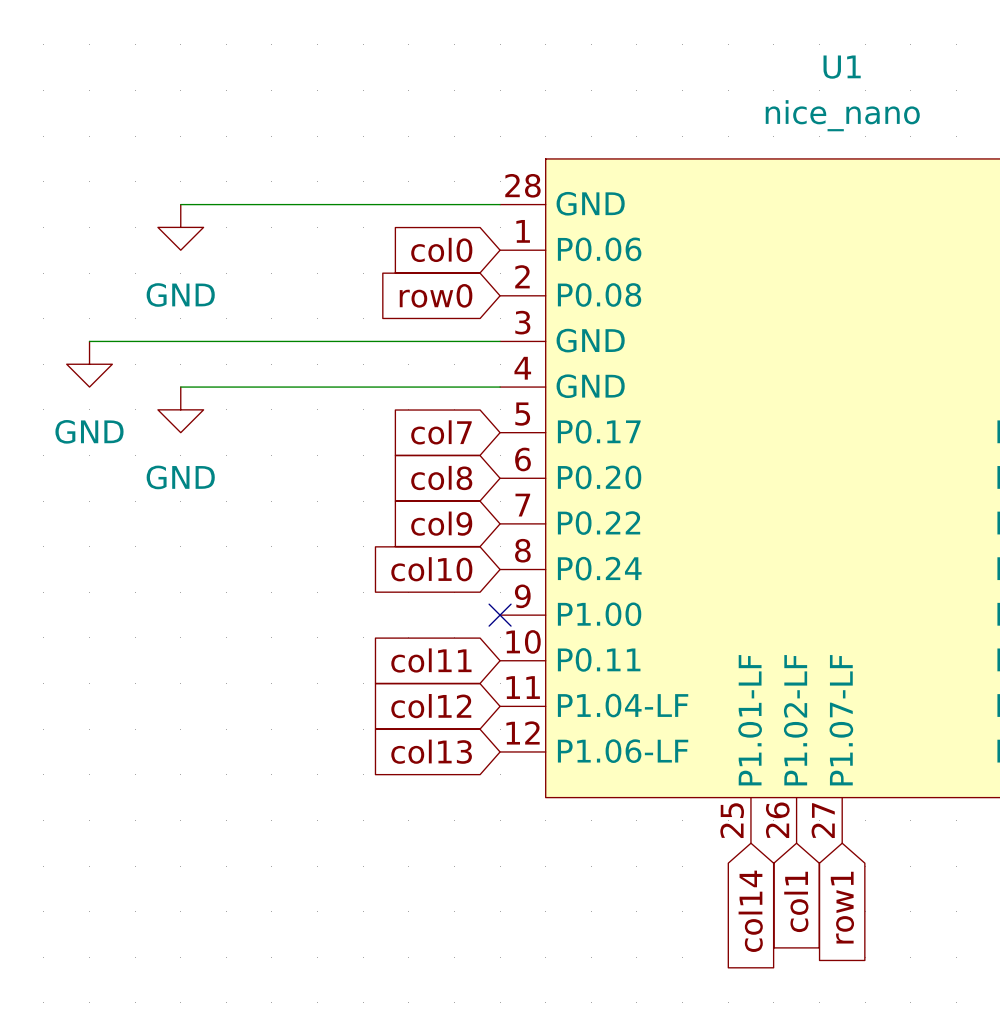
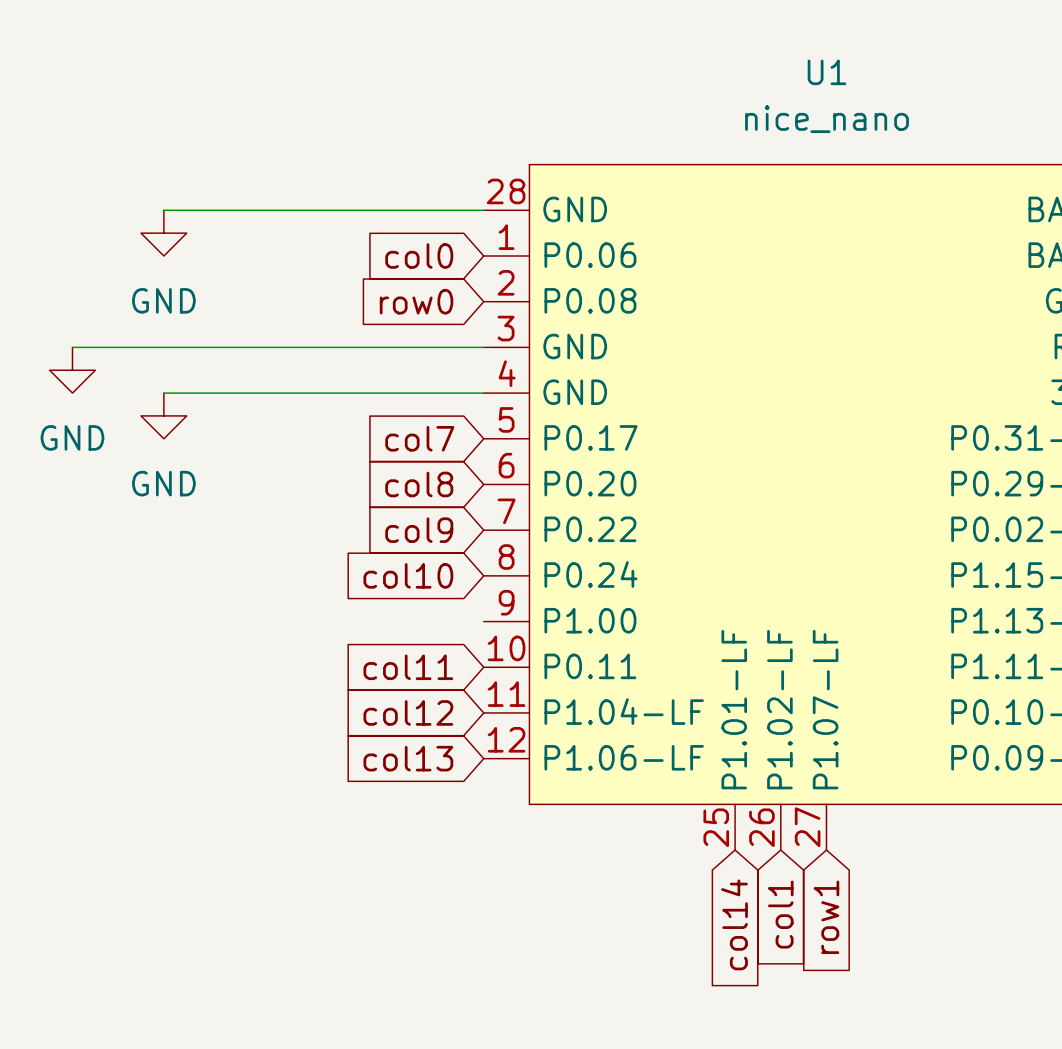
no-connect mark: (500, 615) -> none

